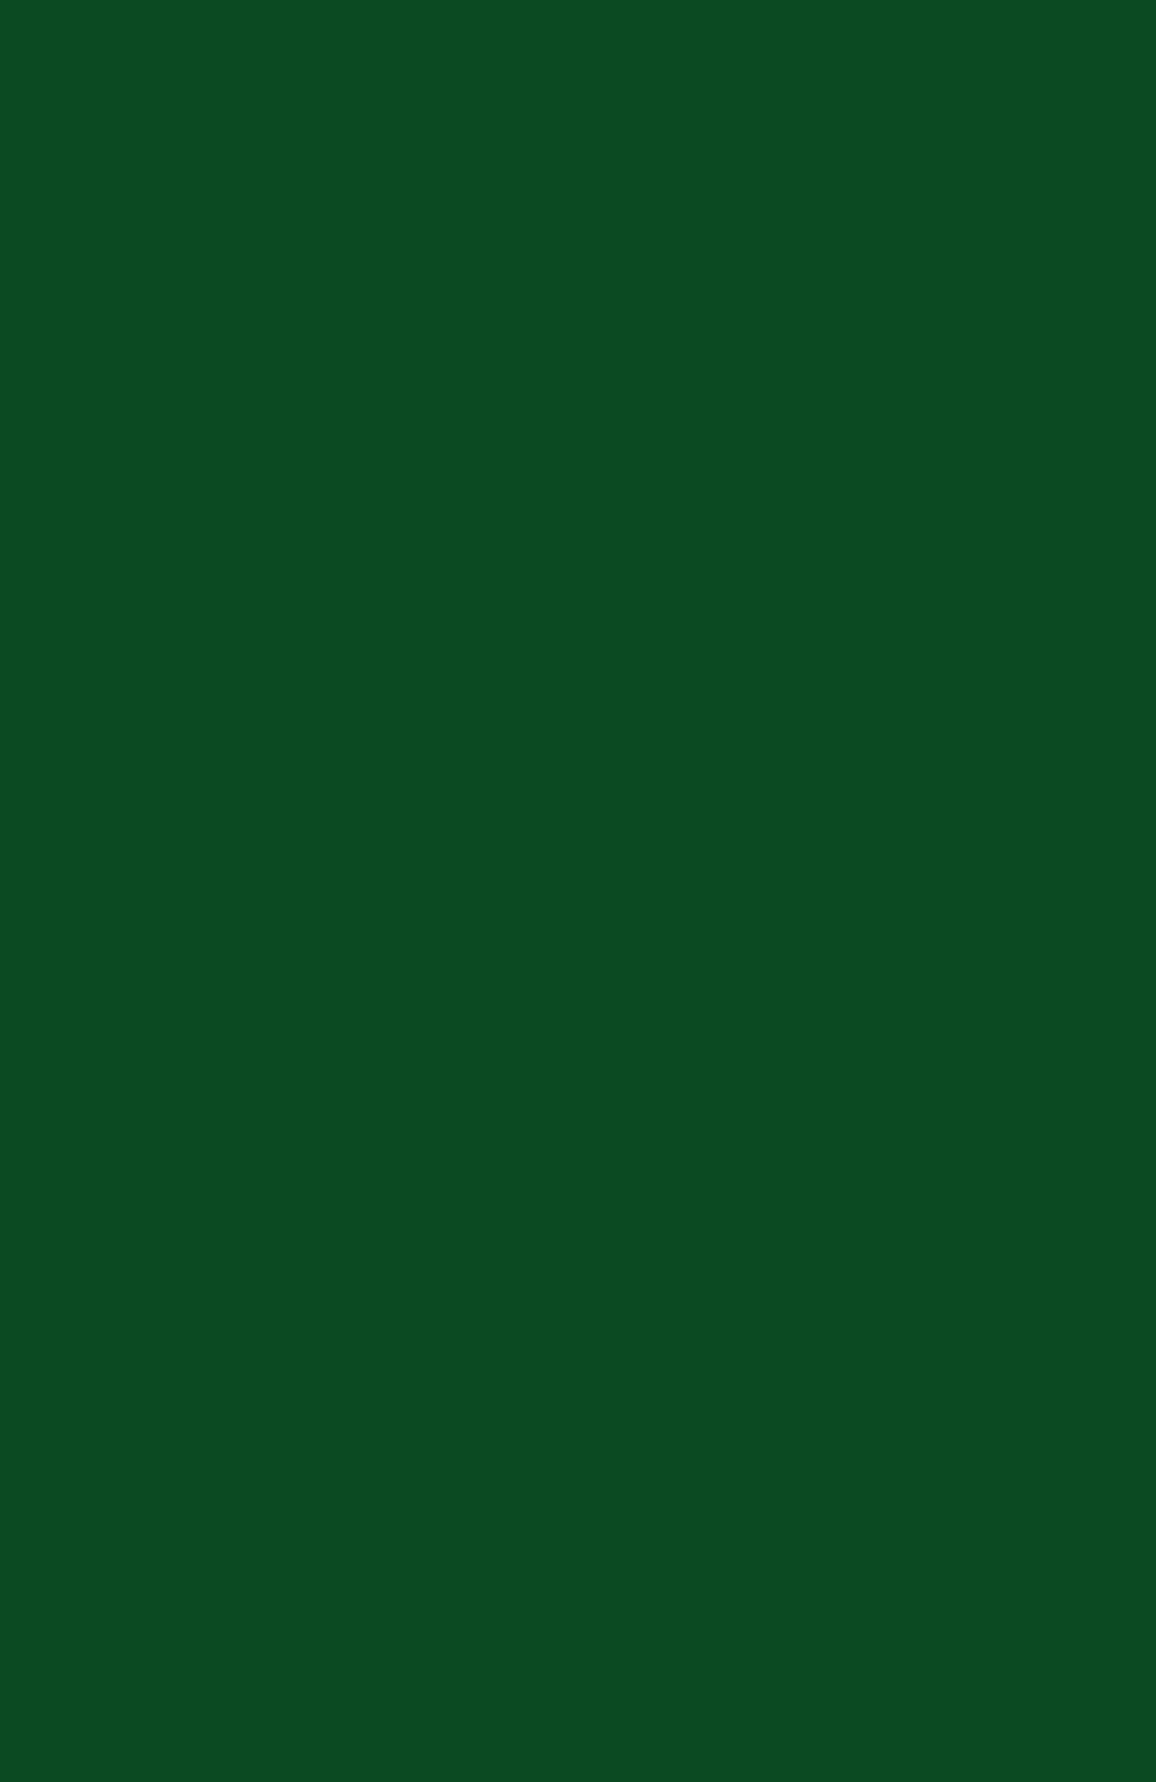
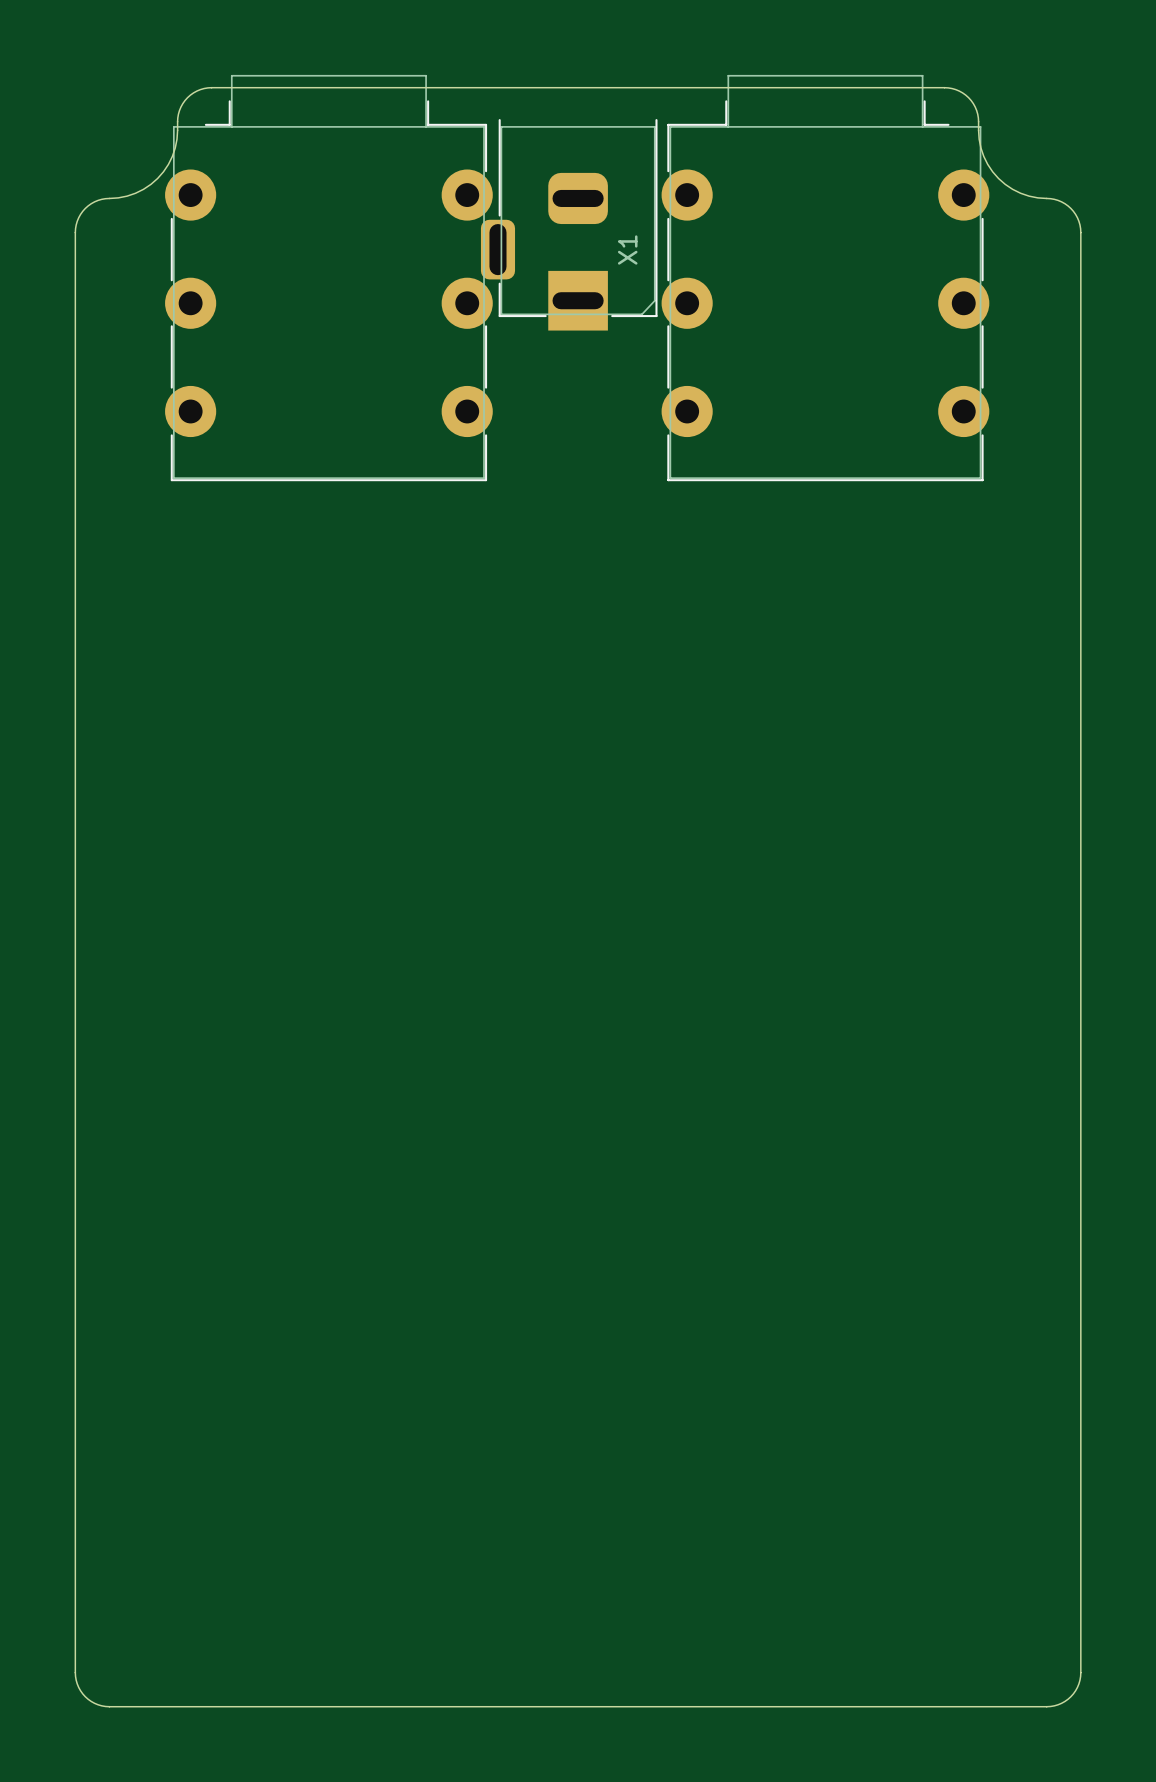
board edge: none -> (211, 87) (948, 87) (962, 92) (973, 103) (977, 114) (980, 147) (987, 164) (998, 178) (1020, 193) (1061, 201) (1070, 208) (1077, 217) (1080, 232) (1080, 1672) (1075, 1690) (1061, 1703) (1046, 1706) (109, 1706) (91, 1701) (78, 1687) (75, 1672) (75, 228) (80, 214) (91, 203) (101, 199) (135, 193) (157, 178) (168, 164) (175, 147) (178, 114) (182, 103) (196, 91) (211, 87)
X1: none -> (577, 278)

